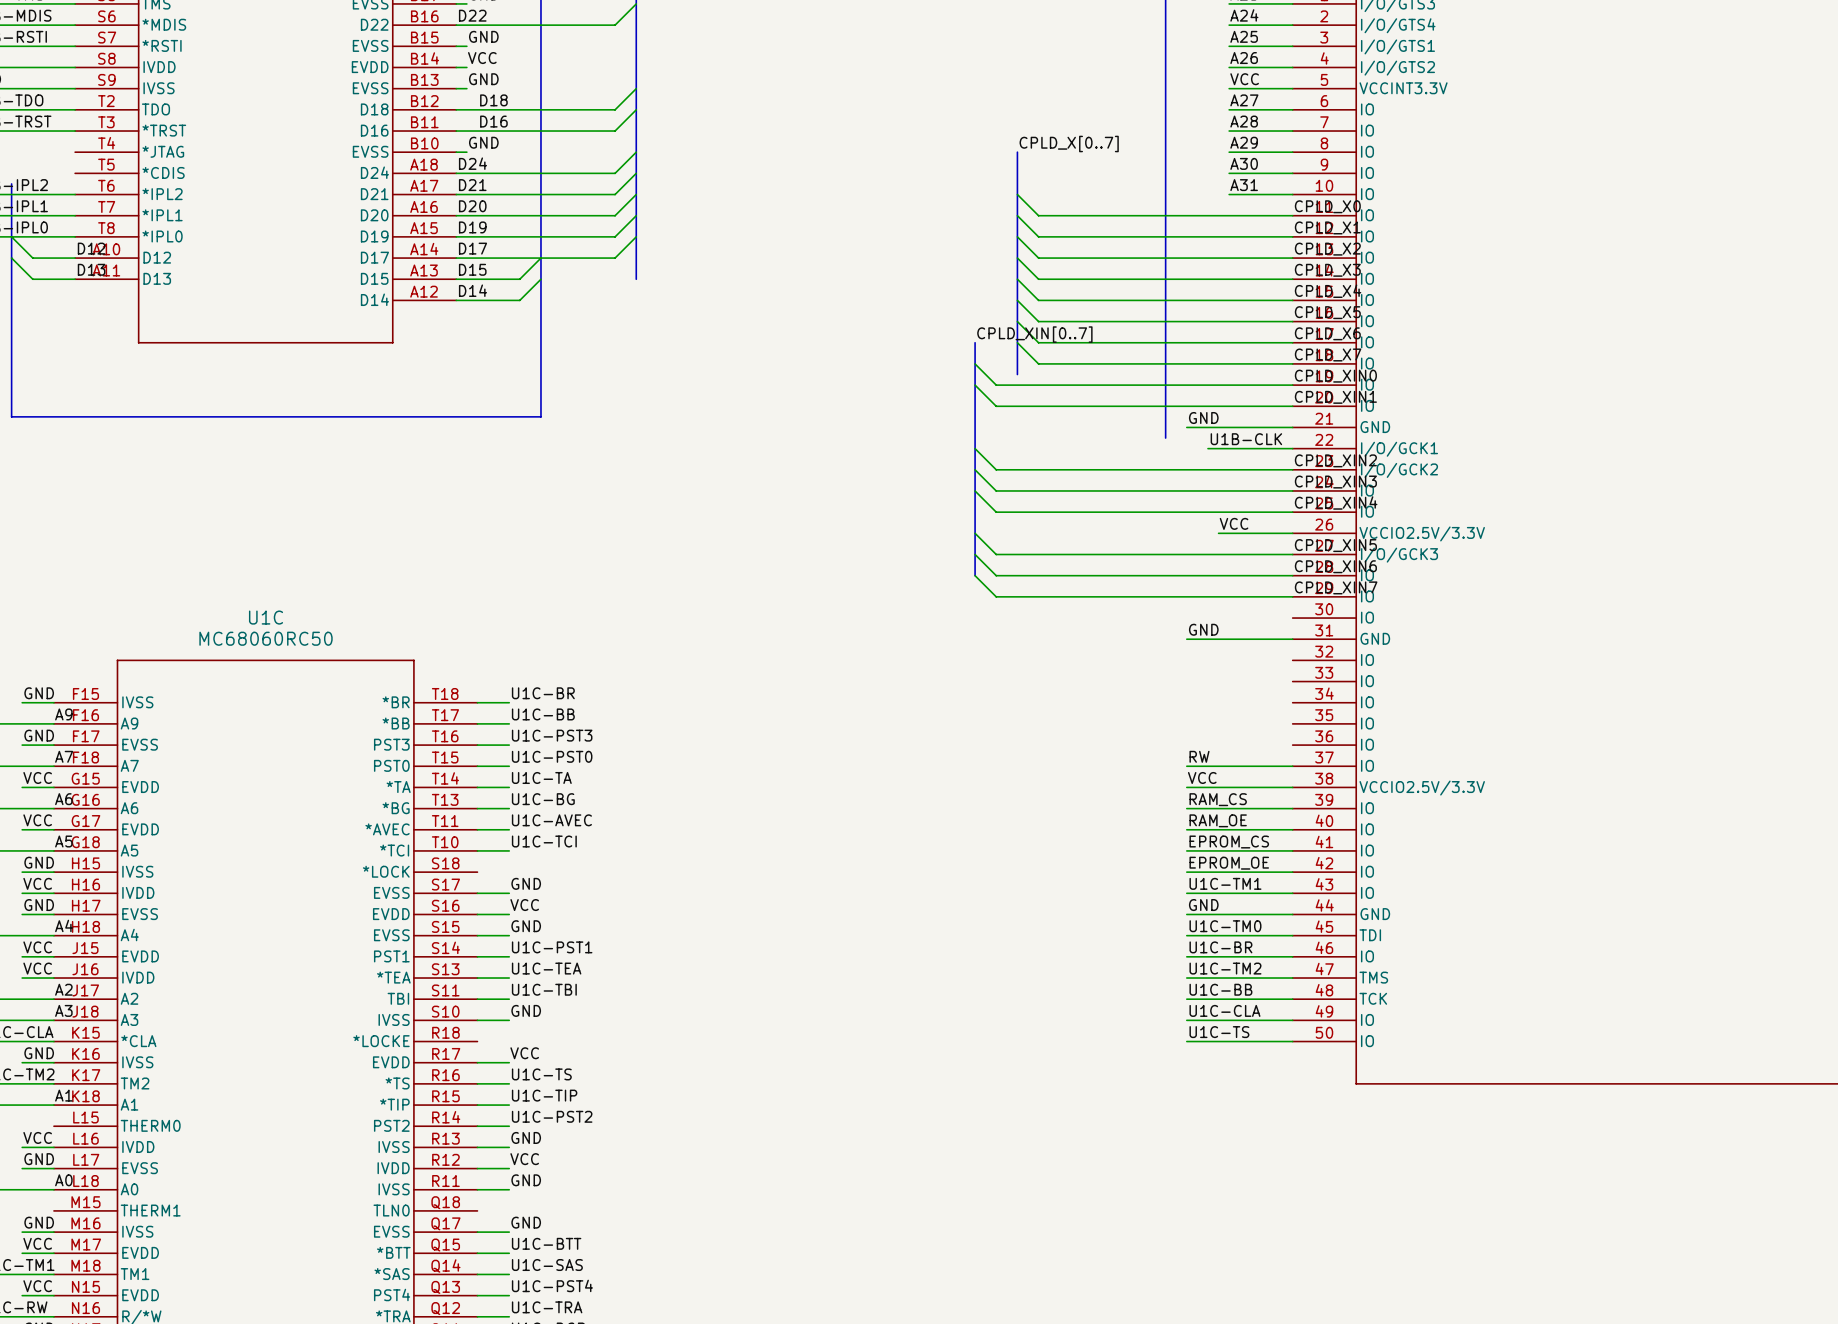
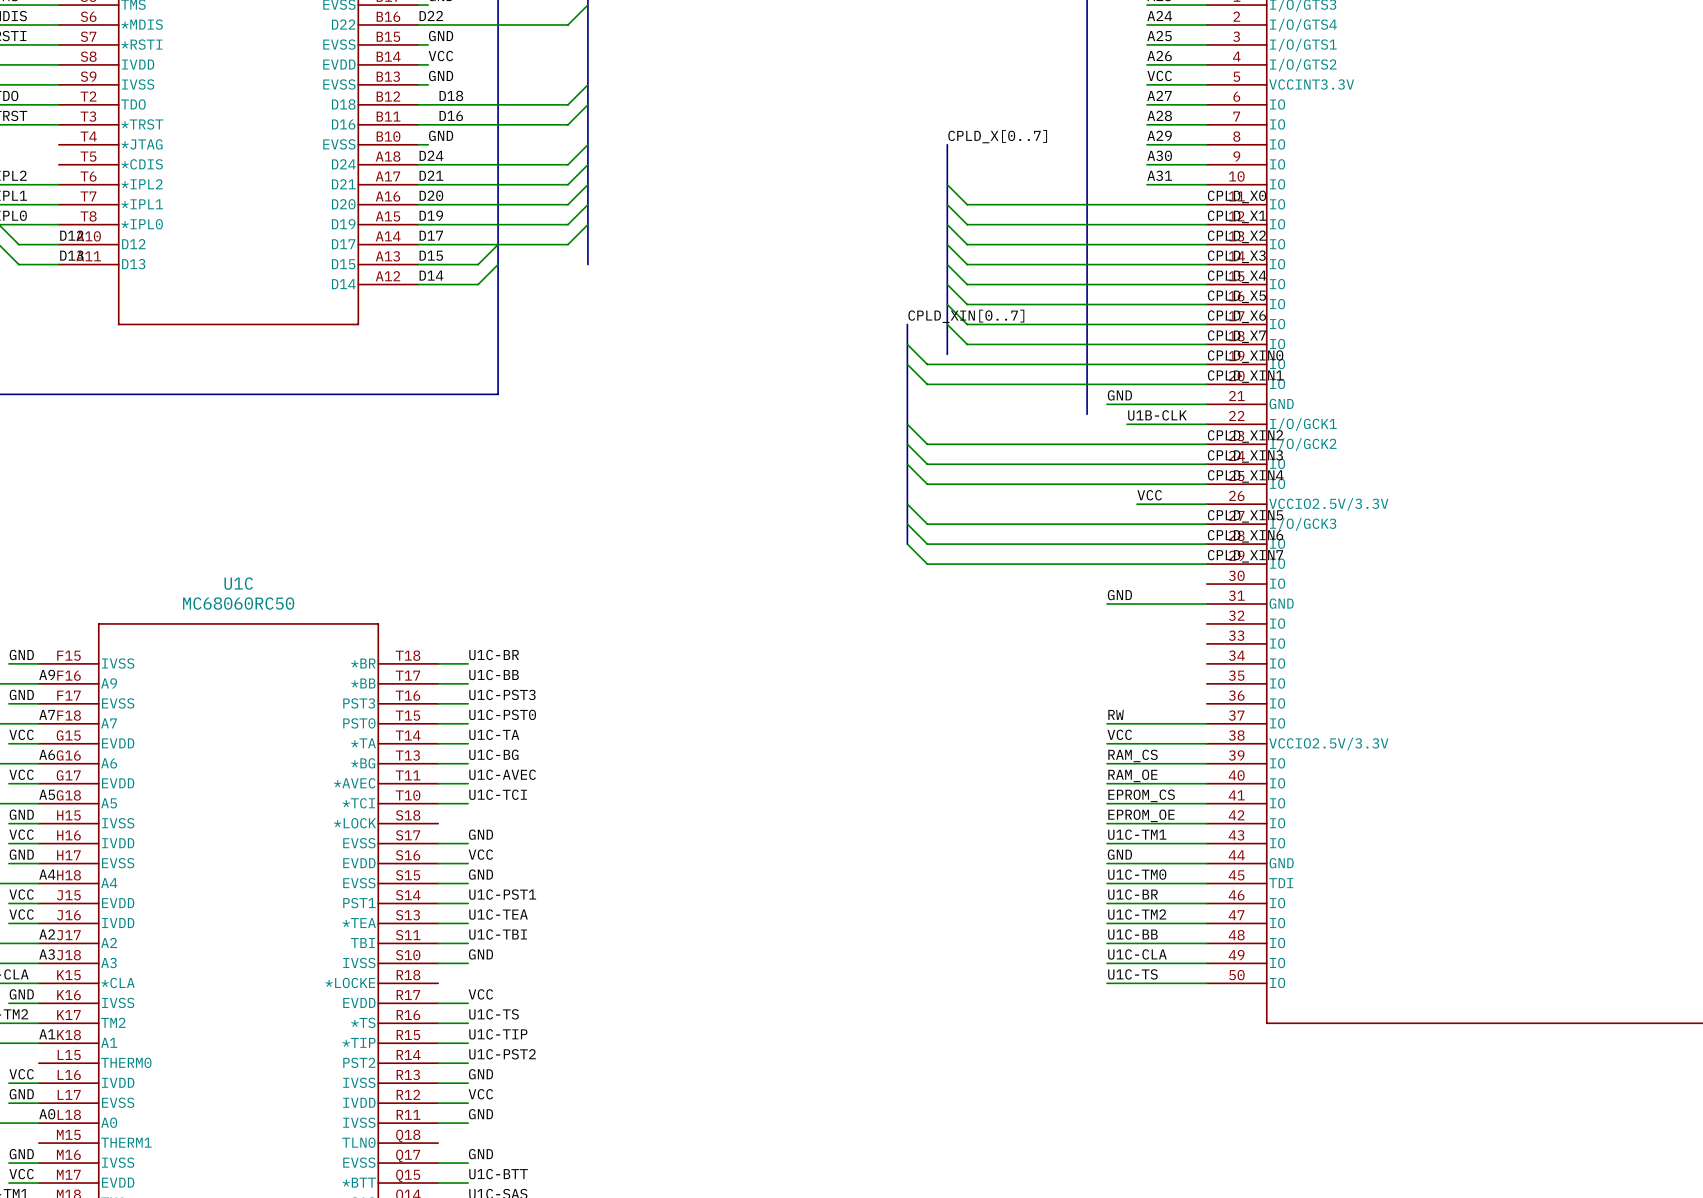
part pin name: TMS (1373, 977) -> IO (1277, 923)
part pin name: TCK (1373, 998) -> IO (1277, 943)

